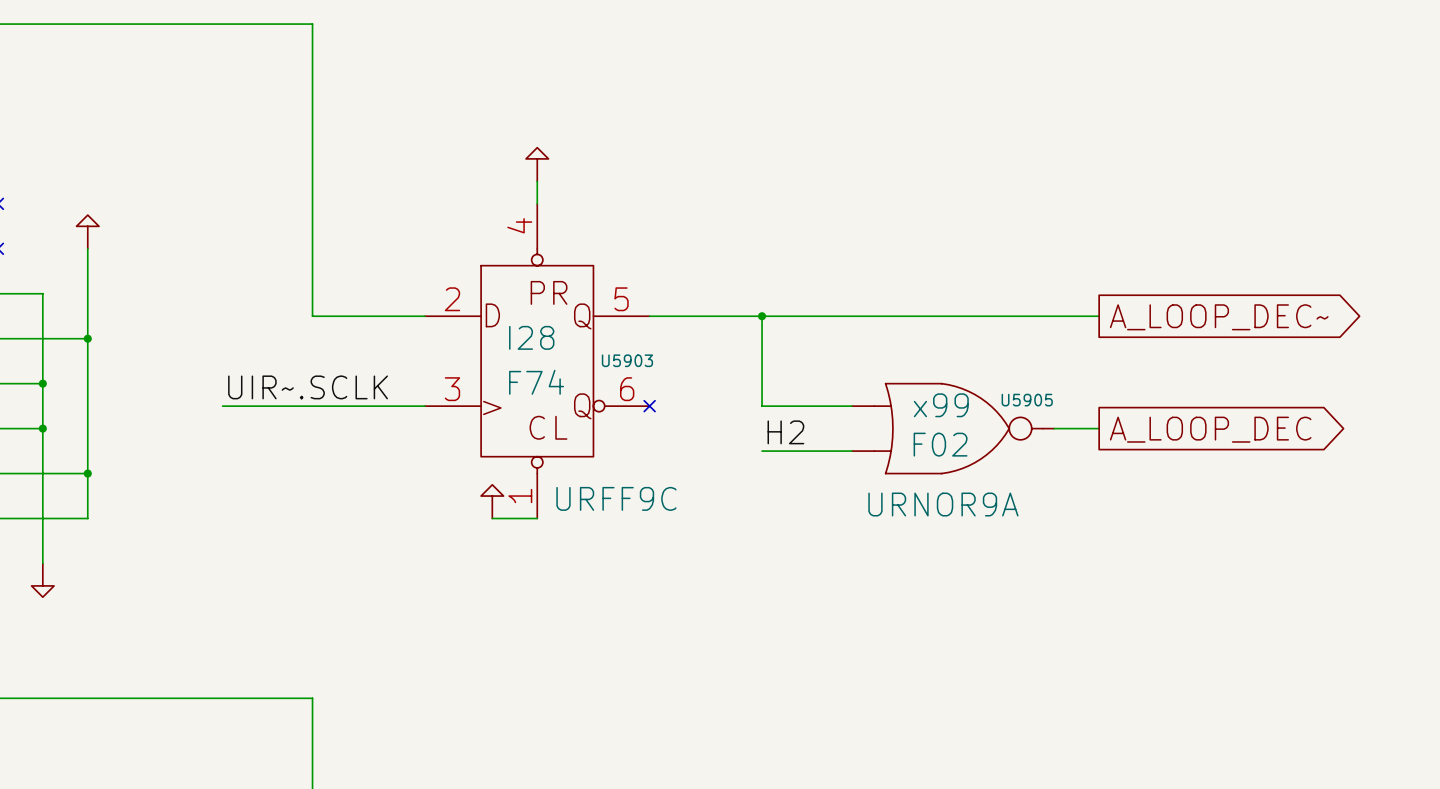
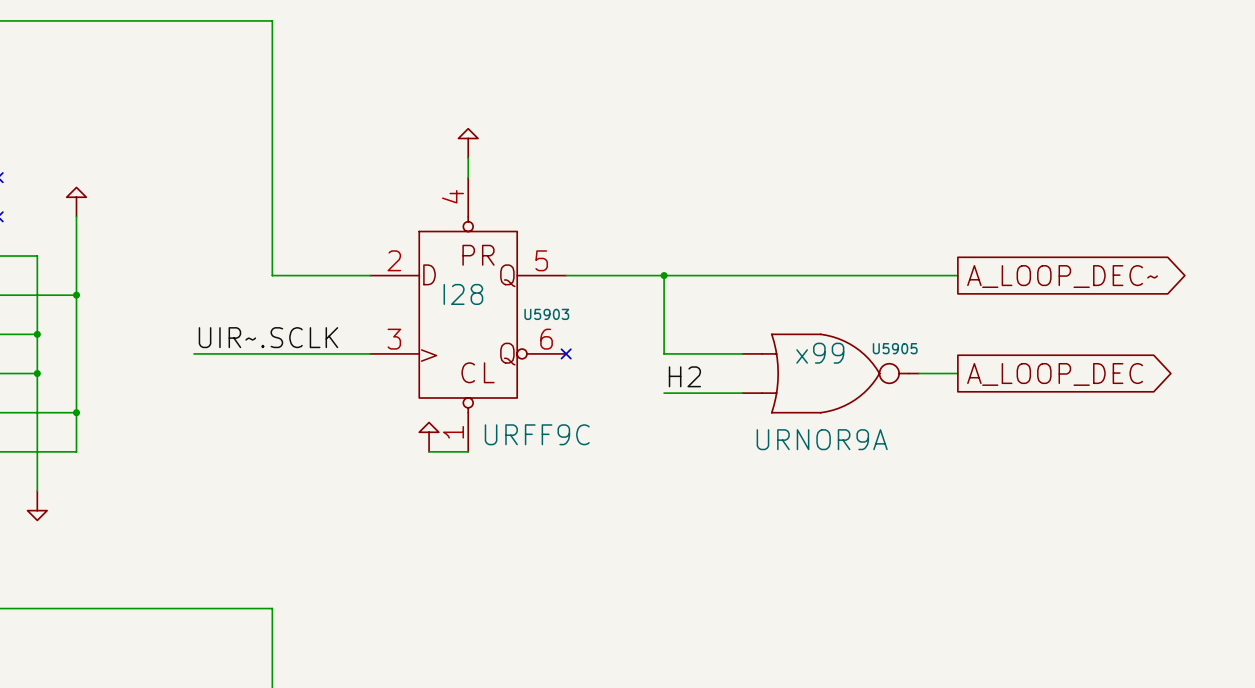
U5903 value: F74 (536, 382) -> none
U5905 value: F02 (940, 444) -> none

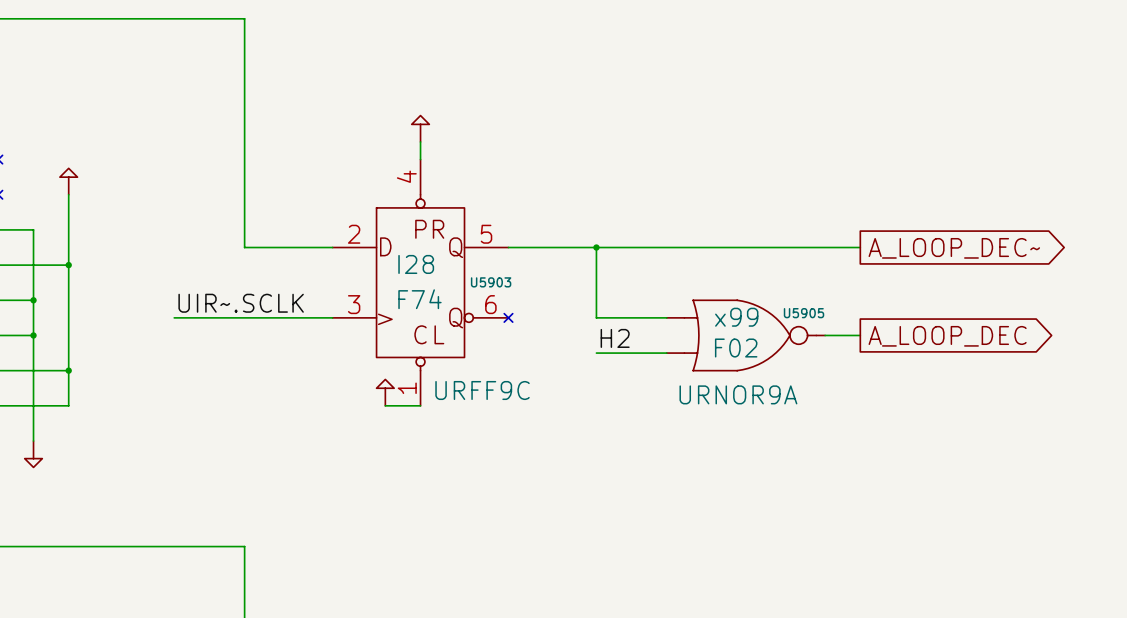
U5903 value: none -> F74 (419, 299)
U5905 value: none -> F02 (736, 348)

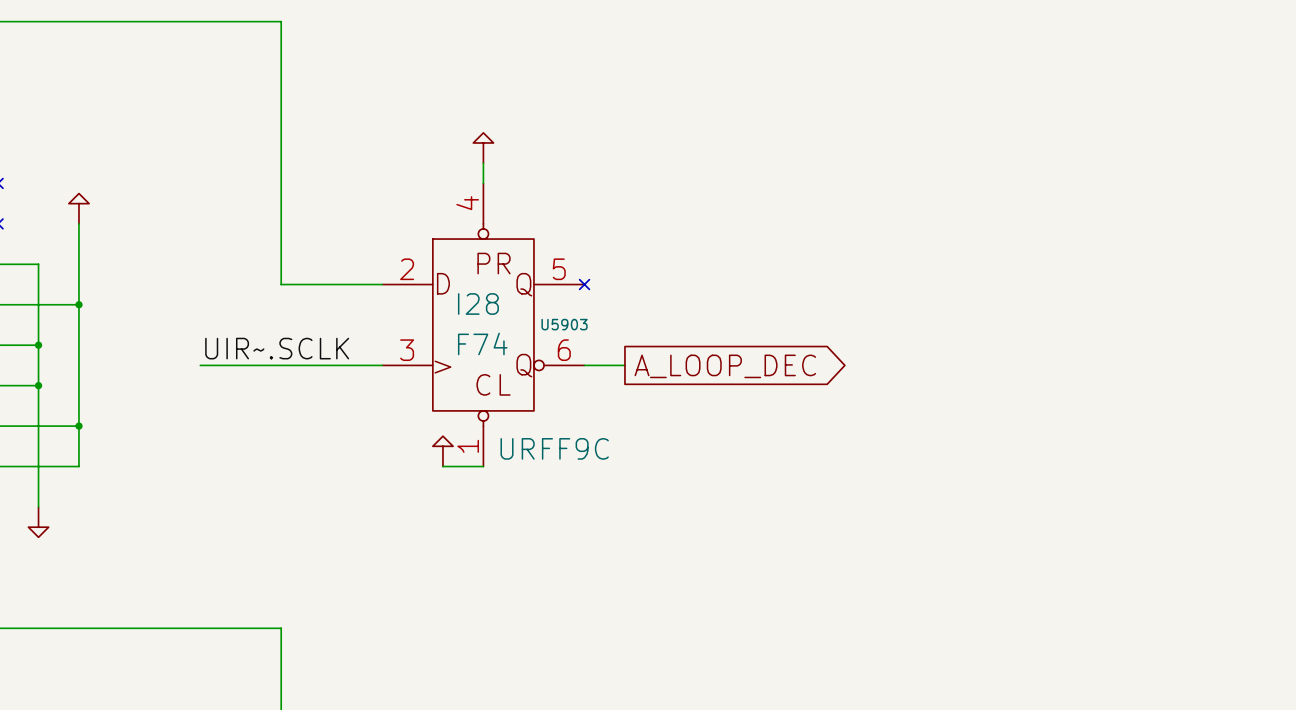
wire: (508, 247) (860, 247) -> none
no-connect mark: none -> (584, 284)
wire: (596, 247) (596, 317) (666, 317) -> none
junction: (596, 247) -> none
global label: A_LOOP_DEC~ (954, 248) -> none
wire: none -> (584, 365) (624, 365)
no-connect mark: (508, 317) -> none
global label: none -> A_LOOP_DEC (725, 366)
U5905: F02 (745, 335) -> none
wire: (825, 335) (860, 335) -> none
global label: A_LOOP_DEC (947, 336) -> none
label: H2 (615, 338) -> none
wire: (596, 353) (666, 353) -> none

